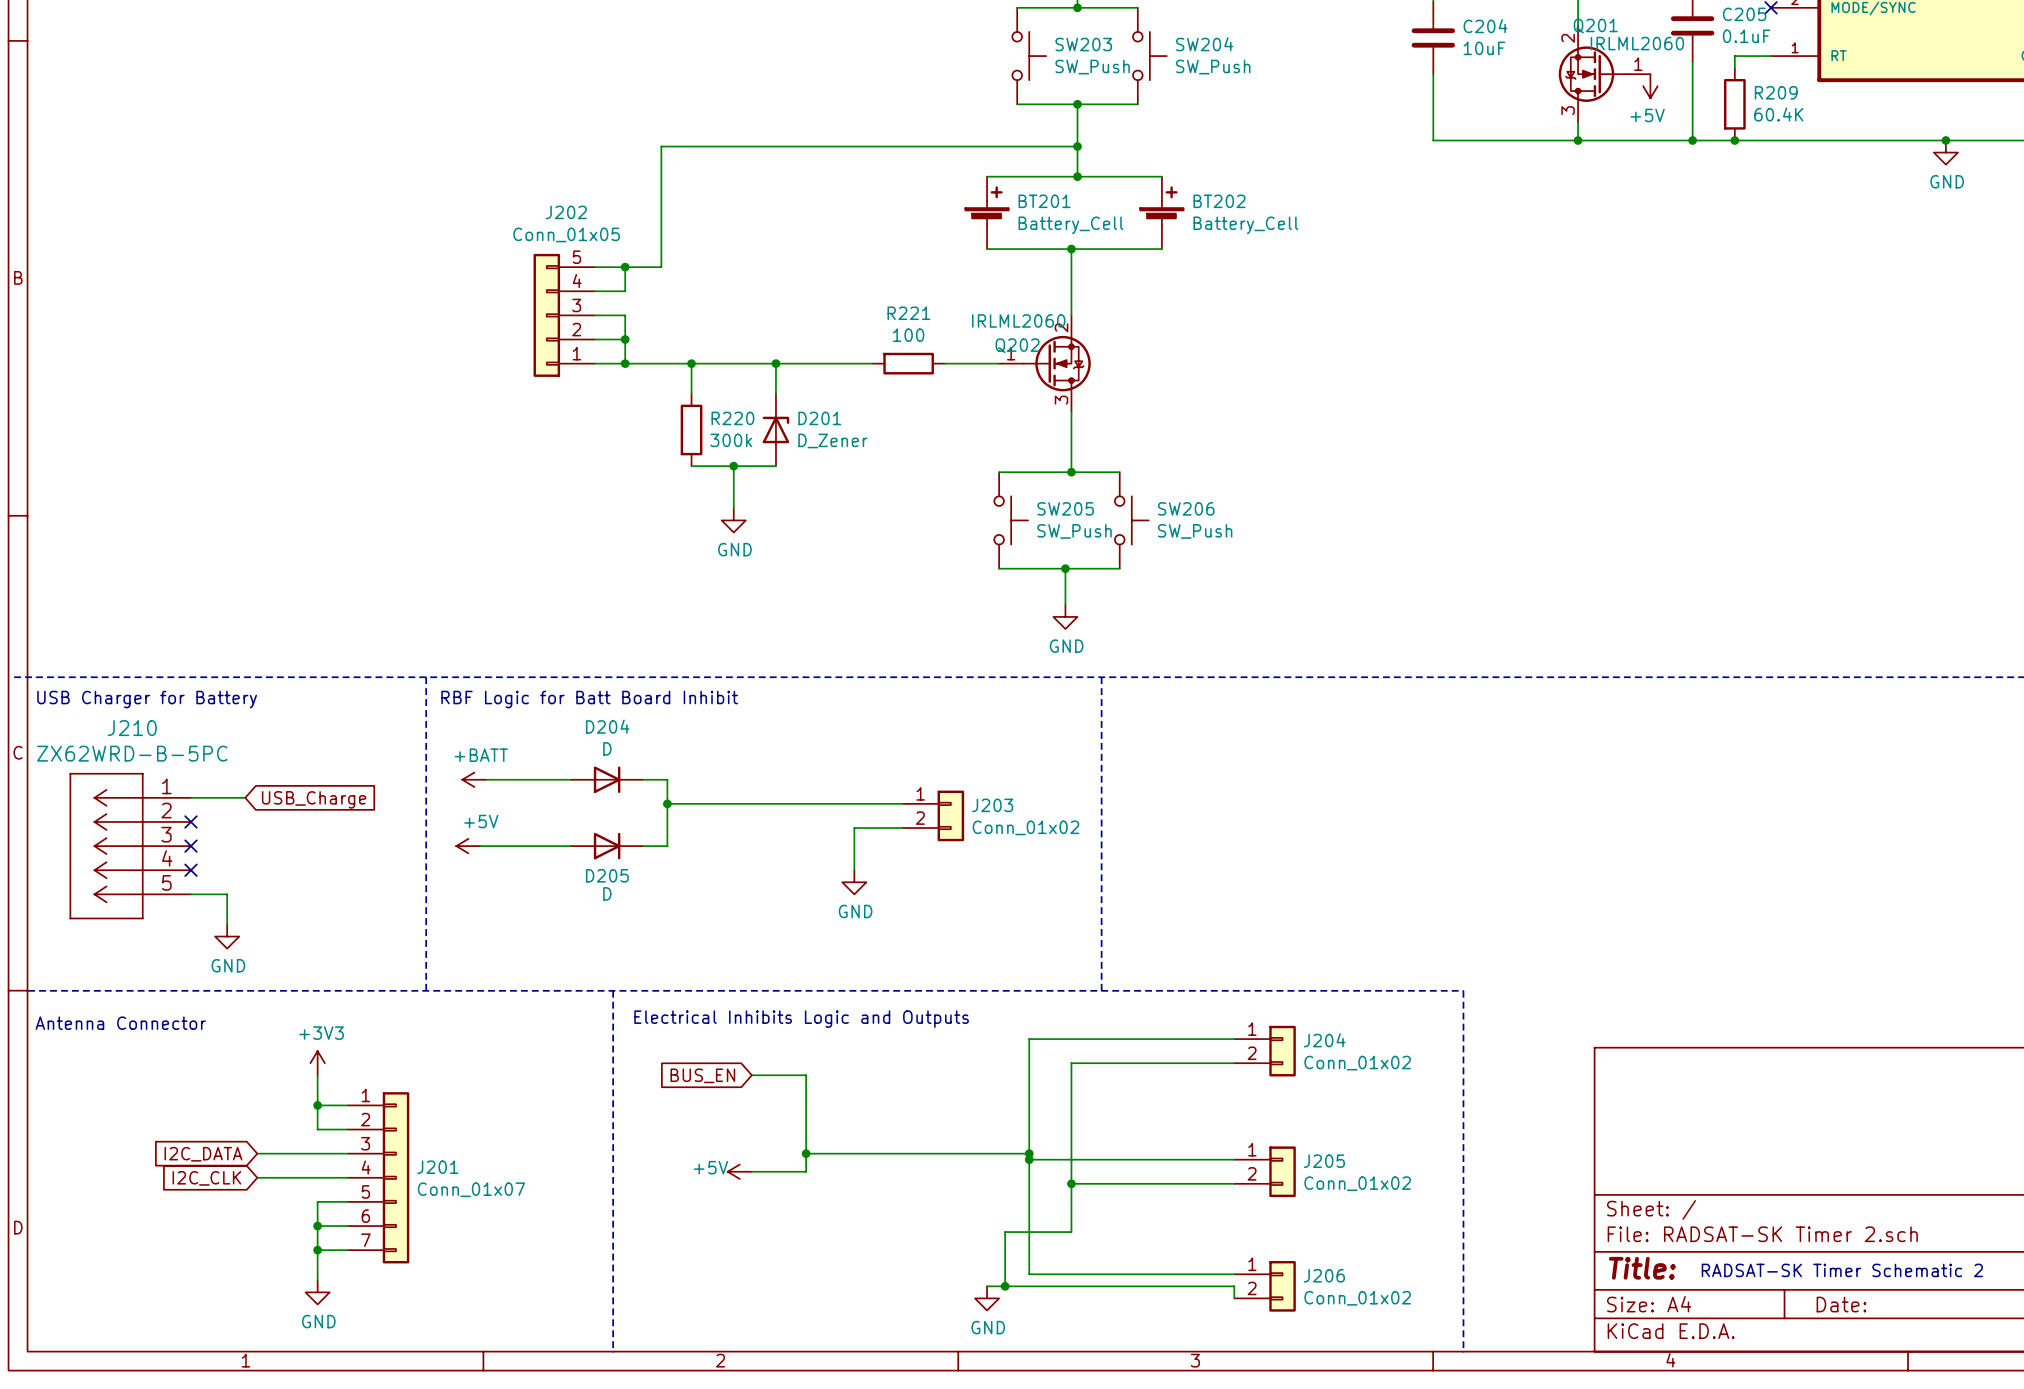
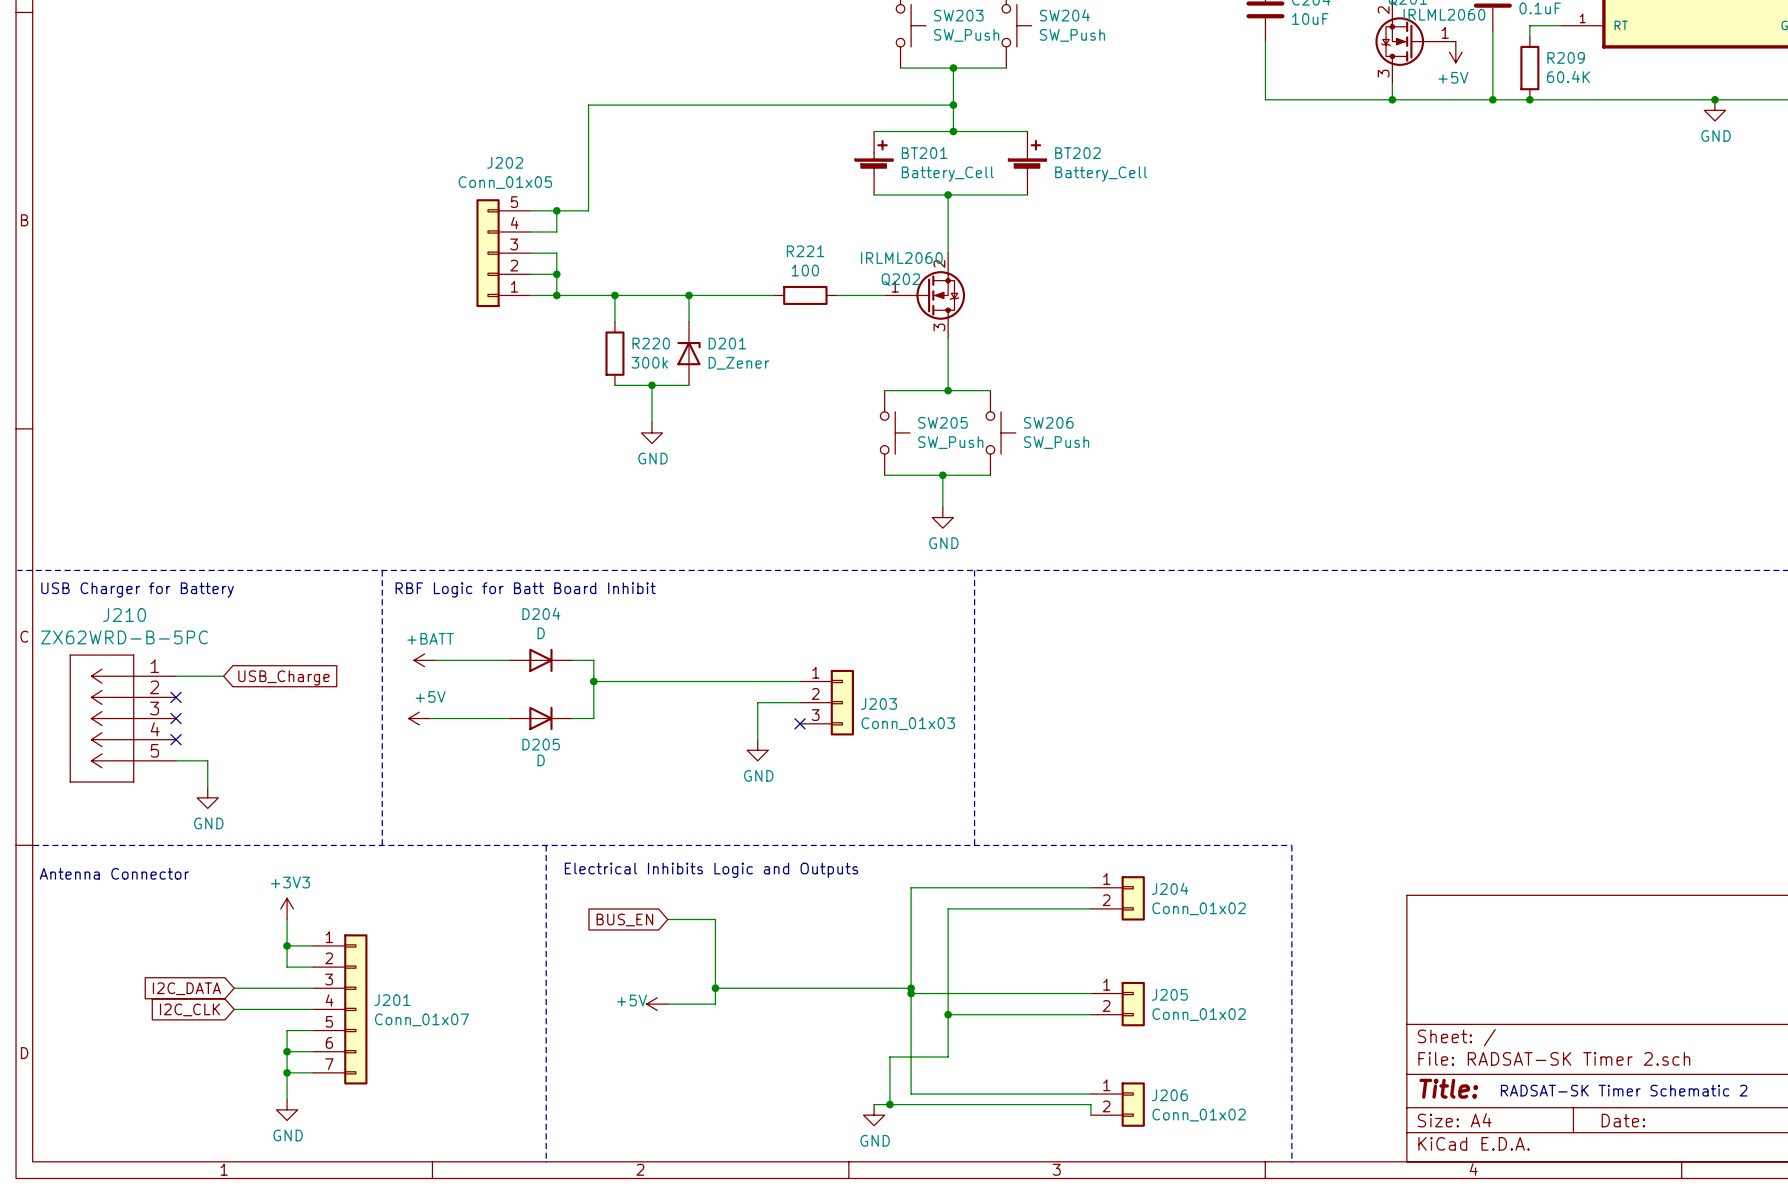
J203 symbol: [902, 790, 965, 842] -> [800, 669, 855, 736]
J203 value: Conn_01x02 (1025, 827) -> Conn_01x03 (908, 723)
no-connect mark: none -> (800, 723)

